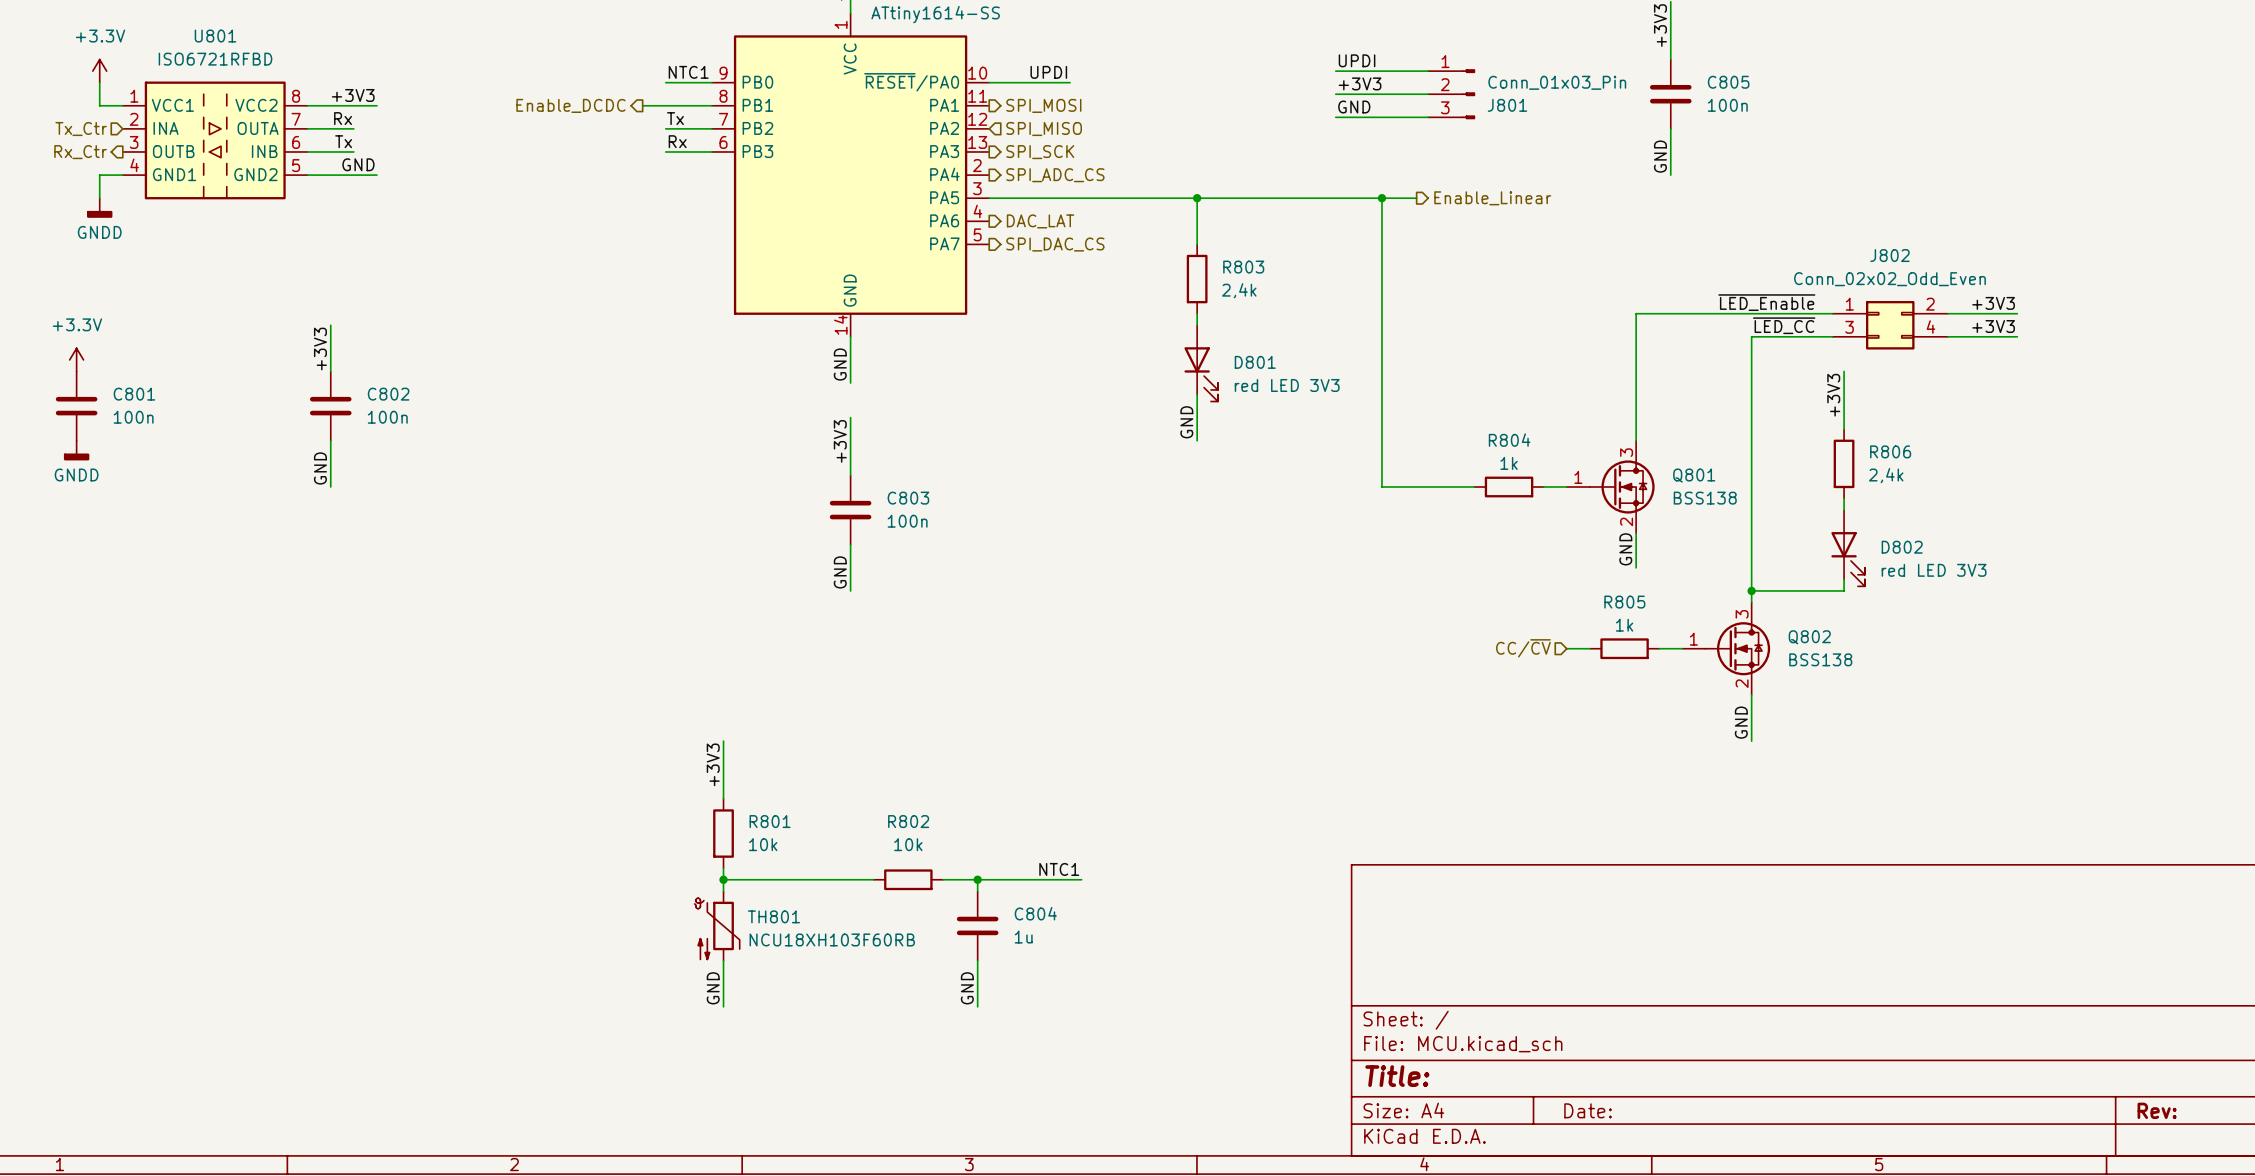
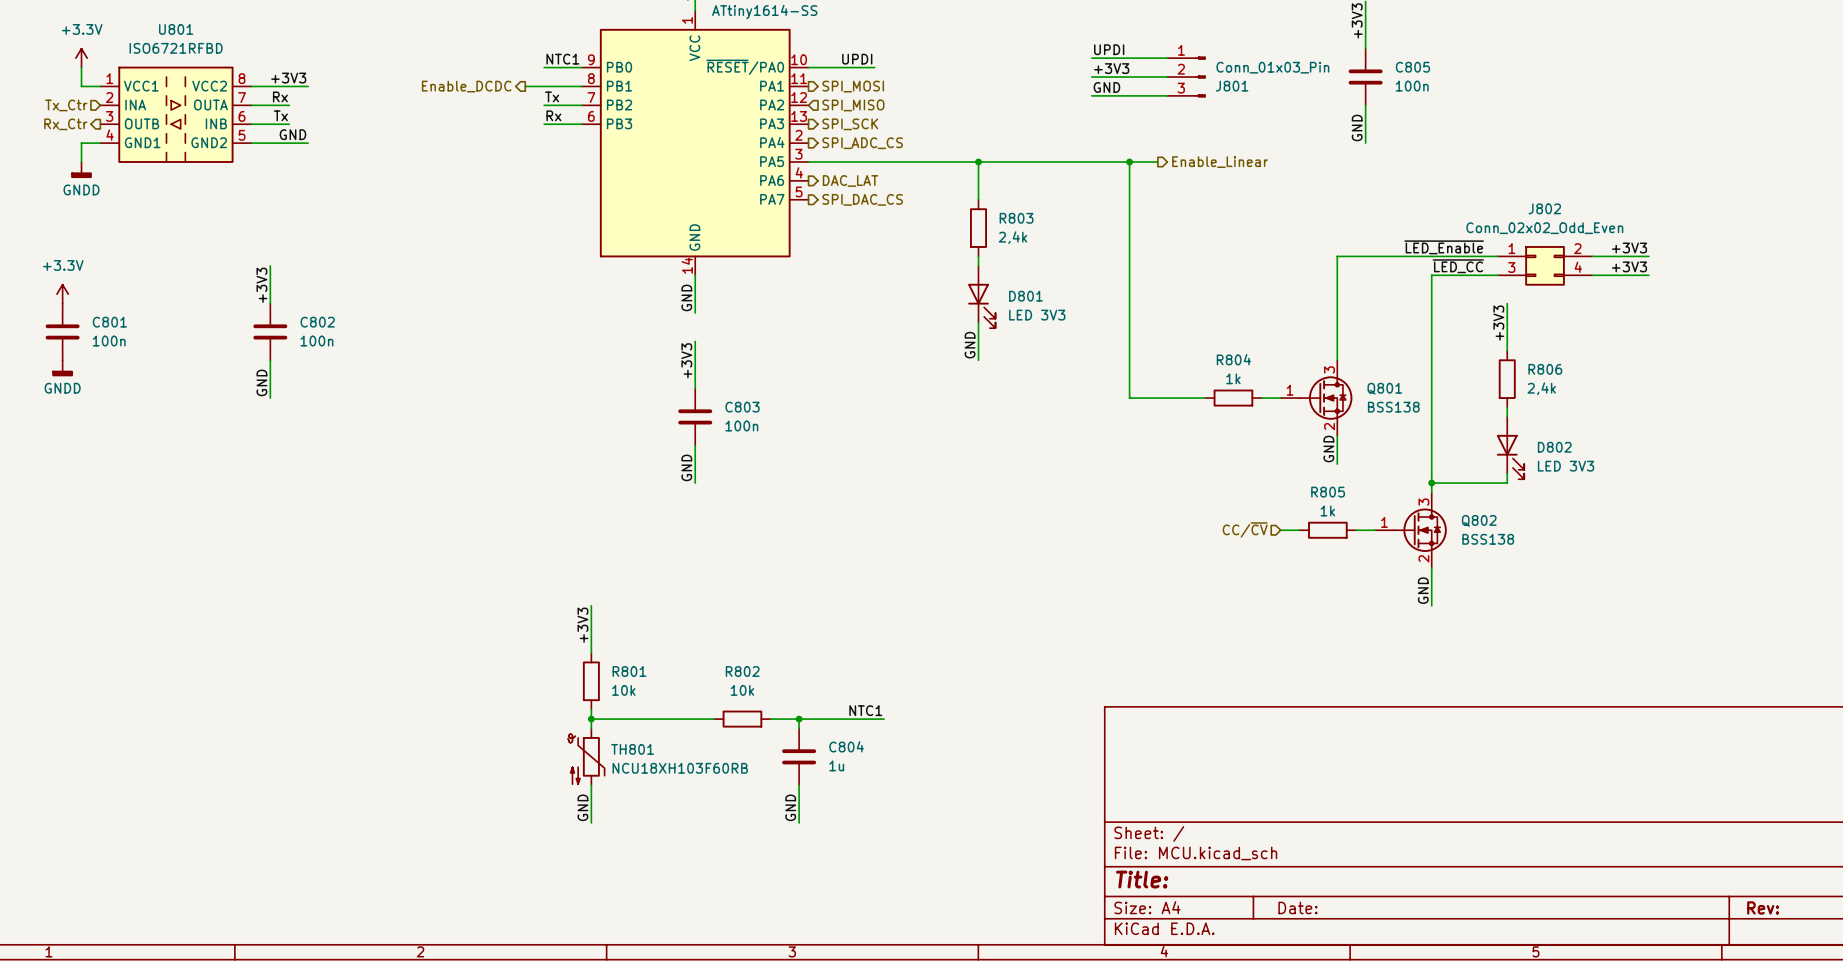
D801 value: red LED 3V3 (1287, 385) -> LED 3V3 (1037, 315)
D802 value: red LED 3V3 (1934, 570) -> LED 3V3 (1566, 466)

